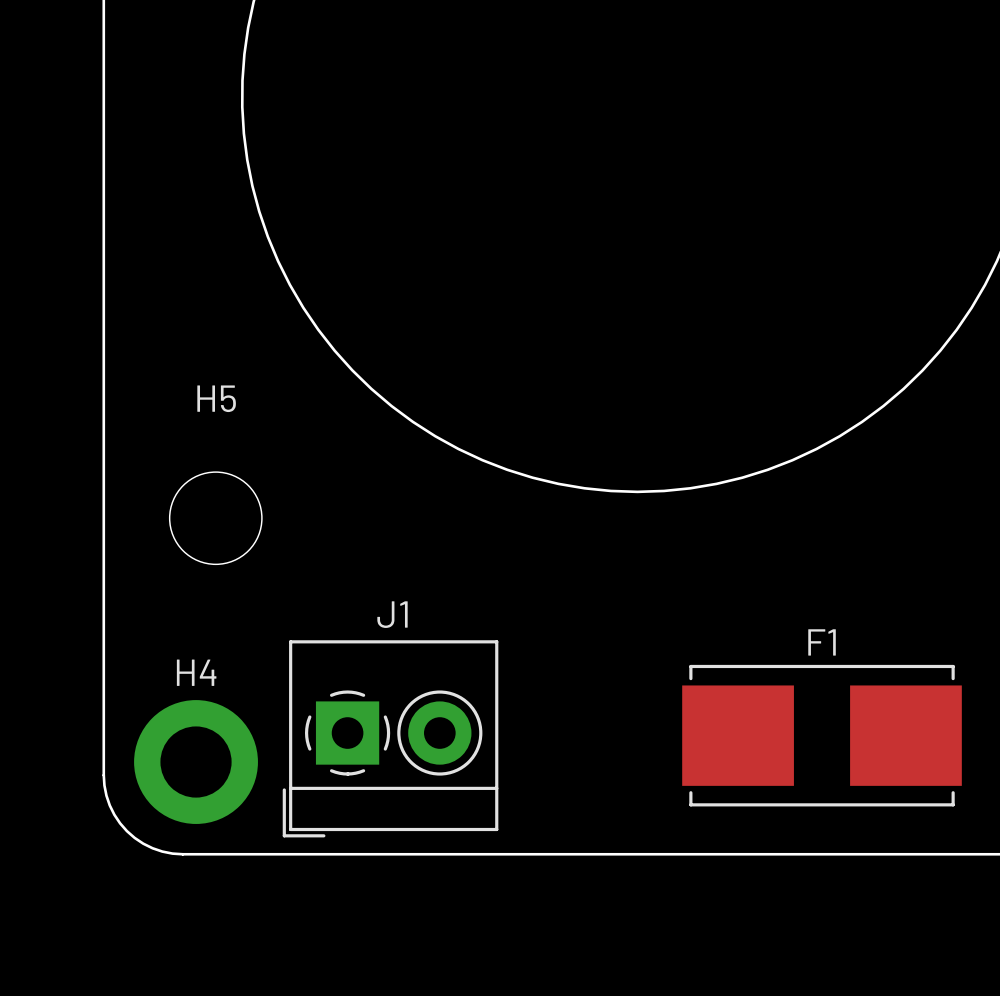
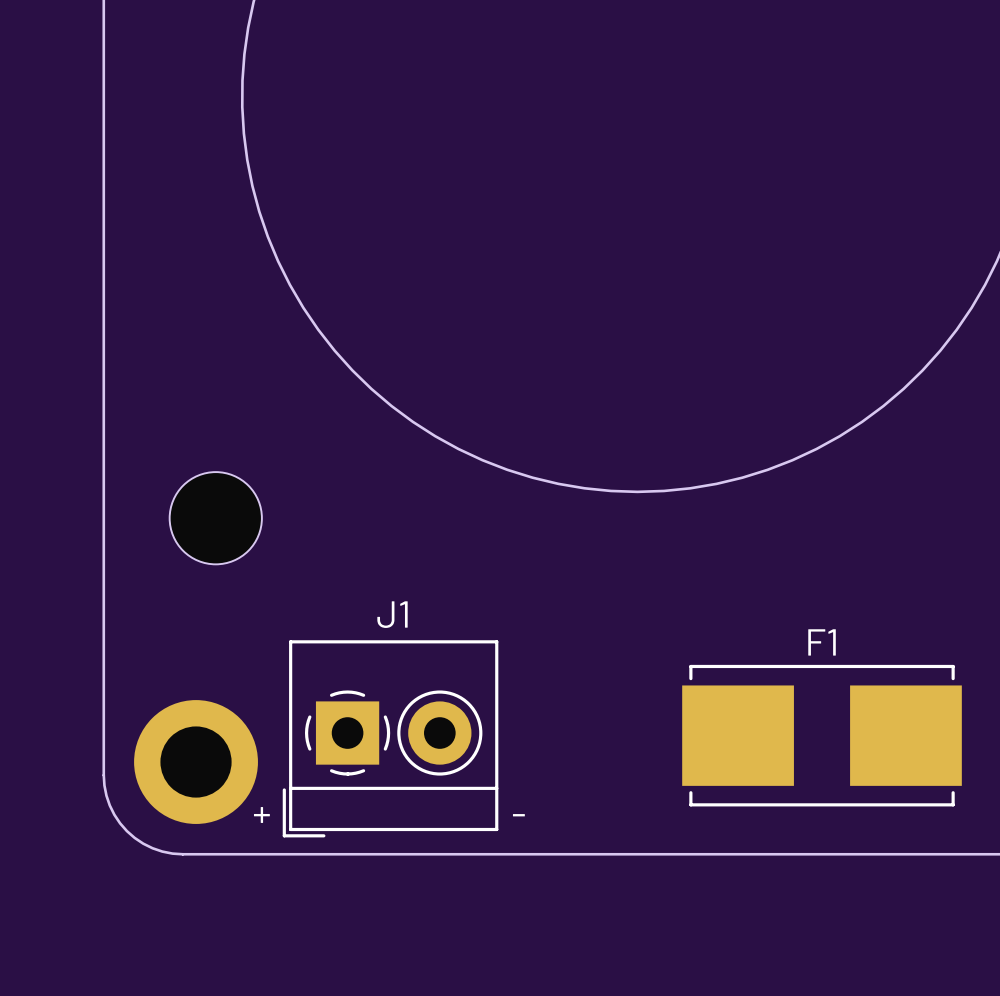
H5 name: H5 (216, 398) -> none
H4 name: H4 (196, 672) -> none
text: none -> + (261, 814)
text: none -> - (518, 815)

